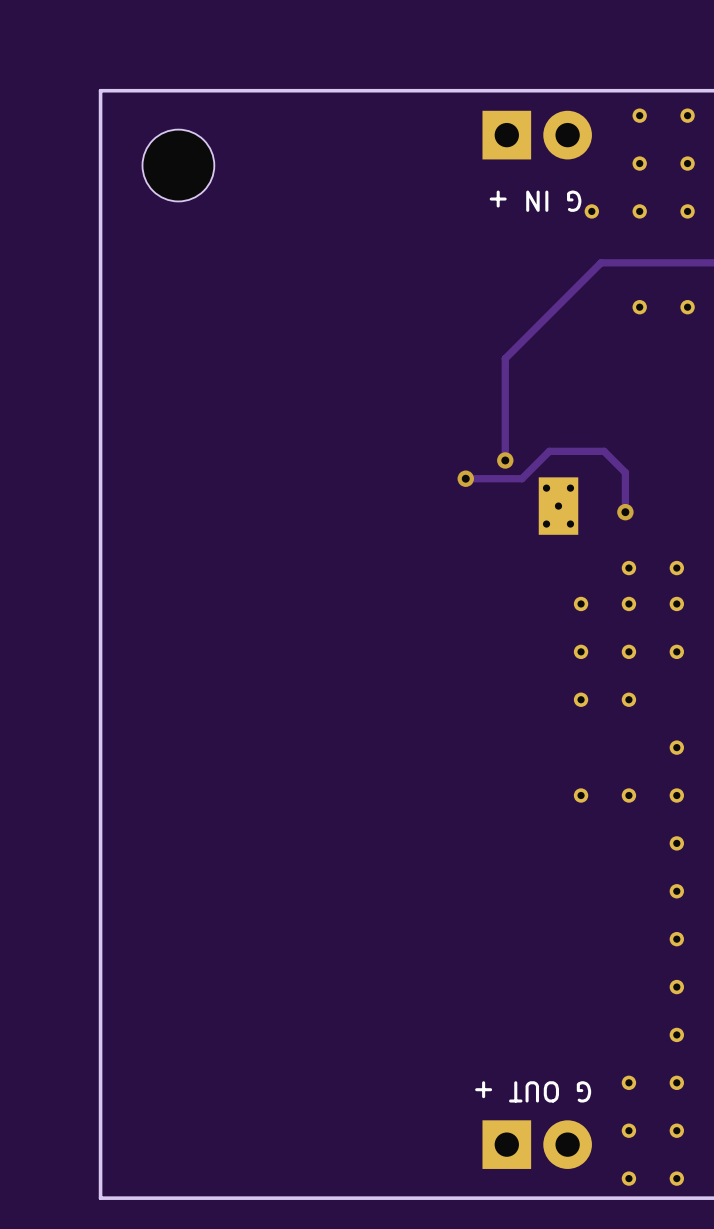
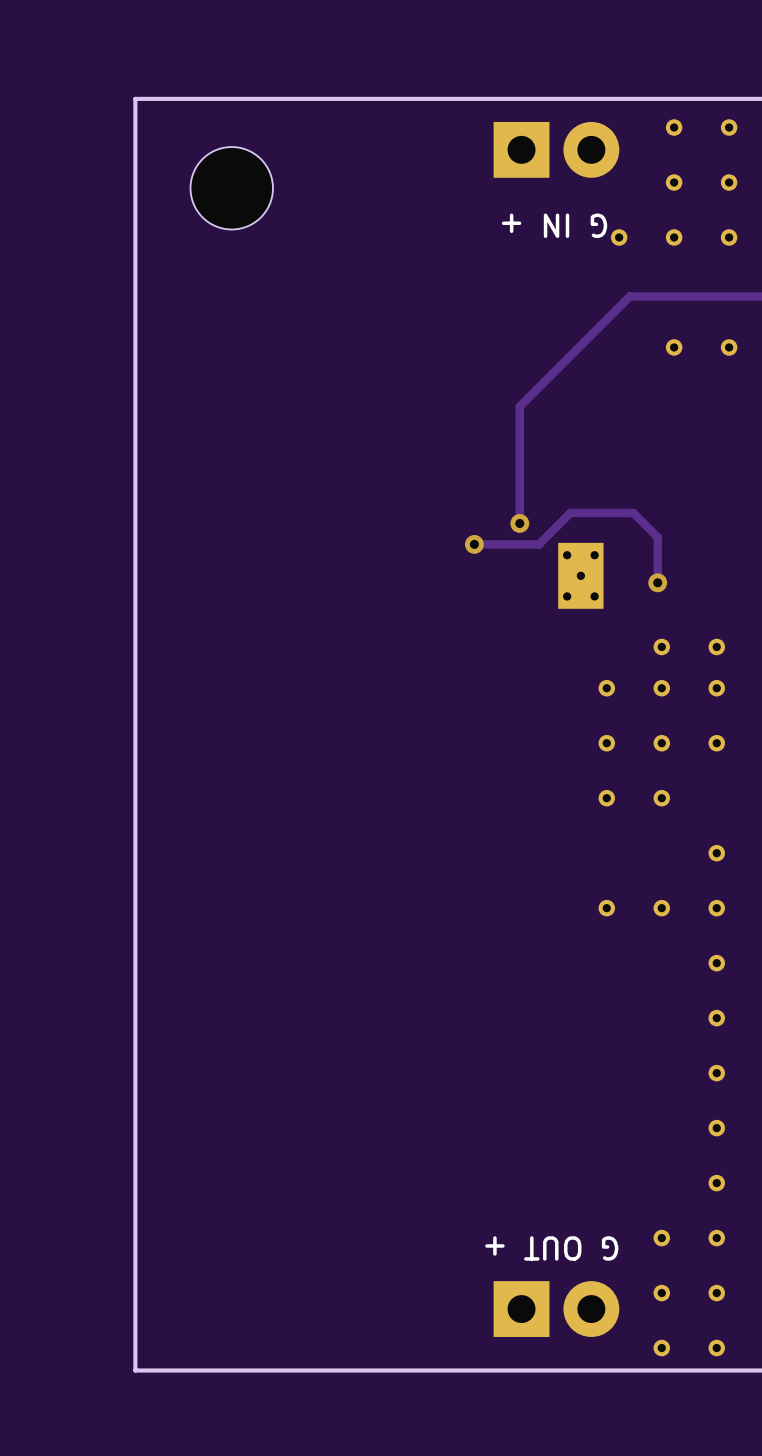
board edge: (170, 90) (100, 90) (100, 1198) (170, 1198) -> (135, 98) (135, 1370)
part position: (178, 165) -> (231, 188)

